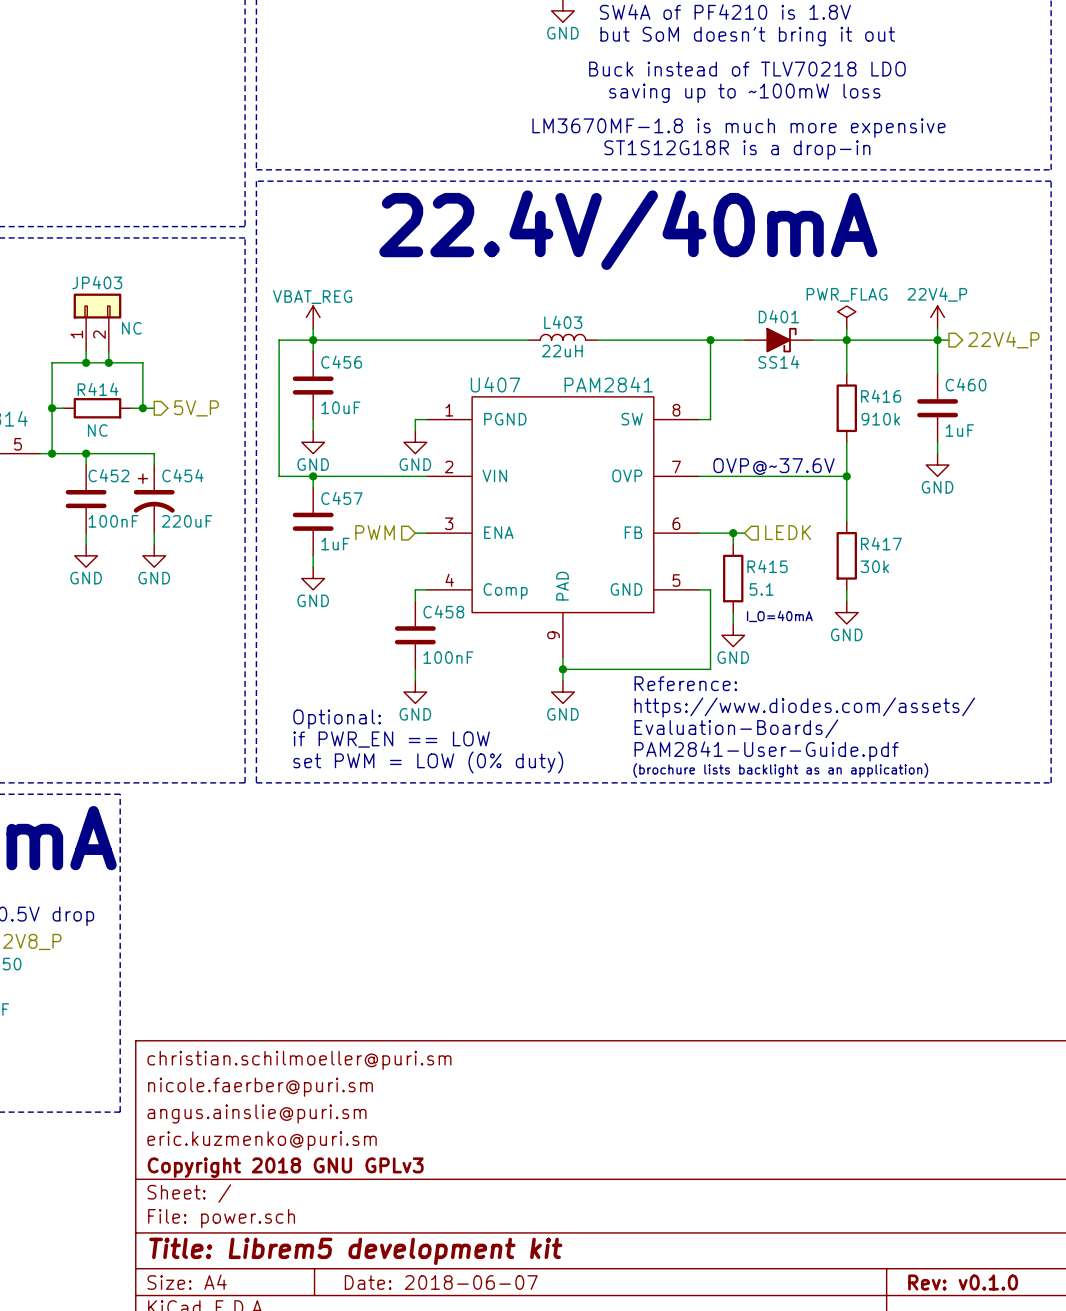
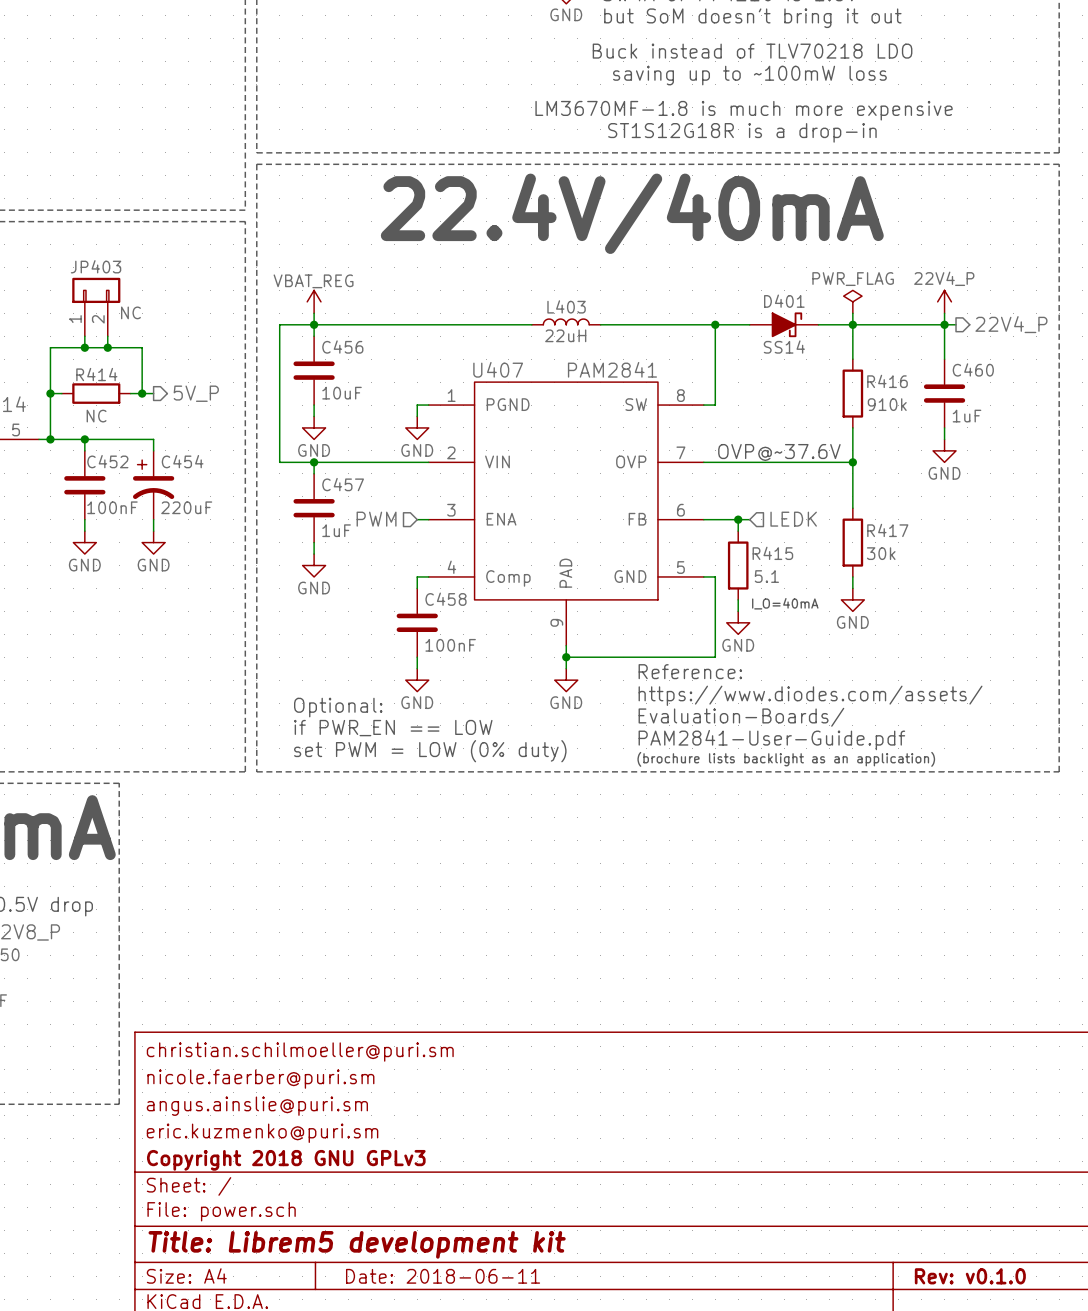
title block: Date: 2018-06-07 (441, 1282) -> Date: 2018-06-11 (443, 1276)

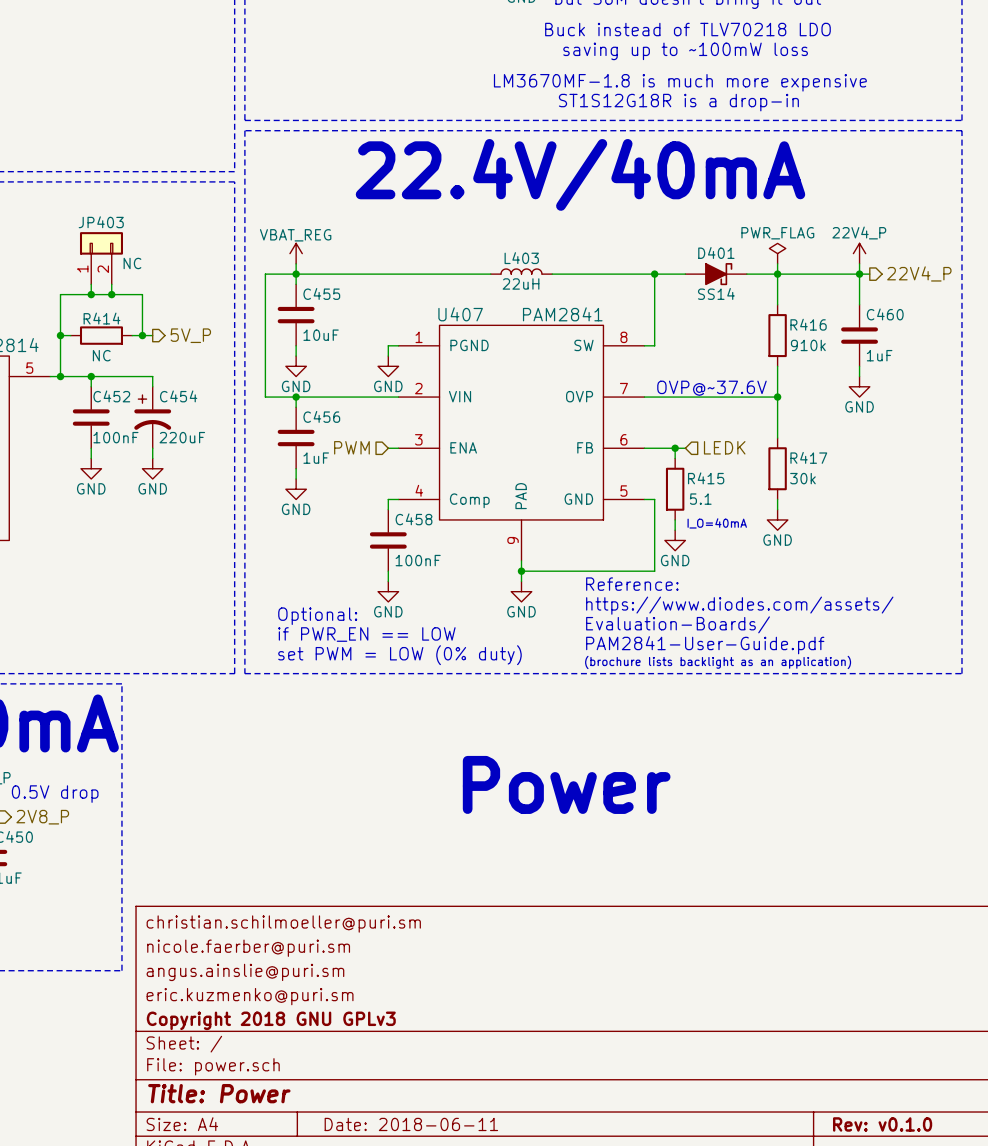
C456 name: C456 (342, 347) -> C455 (321, 293)
C457 name: C457 (343, 484) -> C456 (321, 416)
text: none -> Power (566, 784)
title block: Title: Librem5 development kit (357, 1244) -> Title: Power (219, 1093)

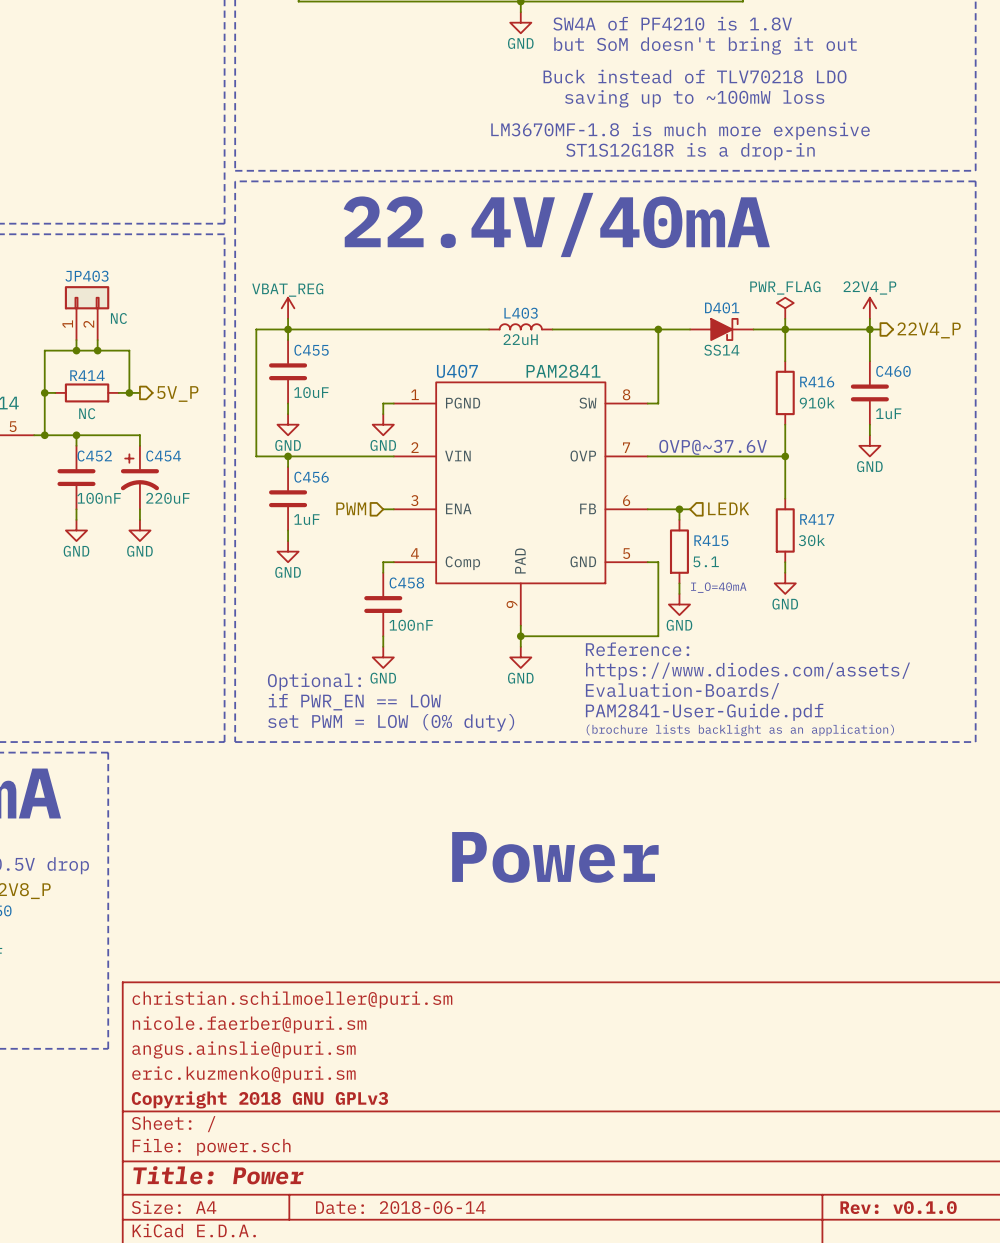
title block: Date: 2018-06-11 (411, 1124) -> Date: 2018-06-14 (400, 1207)

